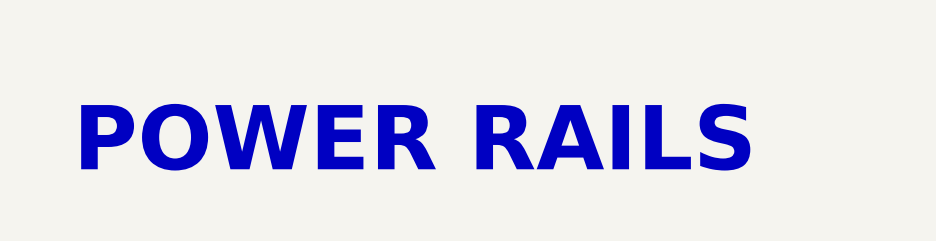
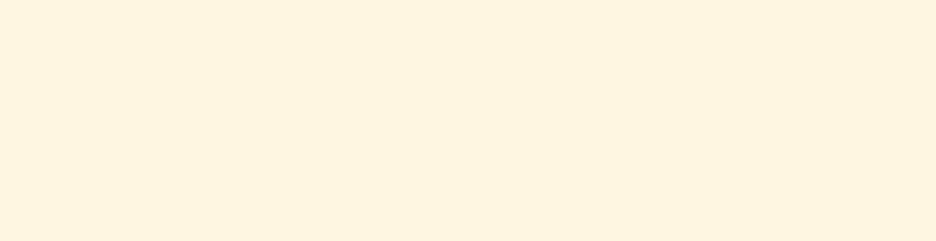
text: POWER RAILS (415, 137) -> none

